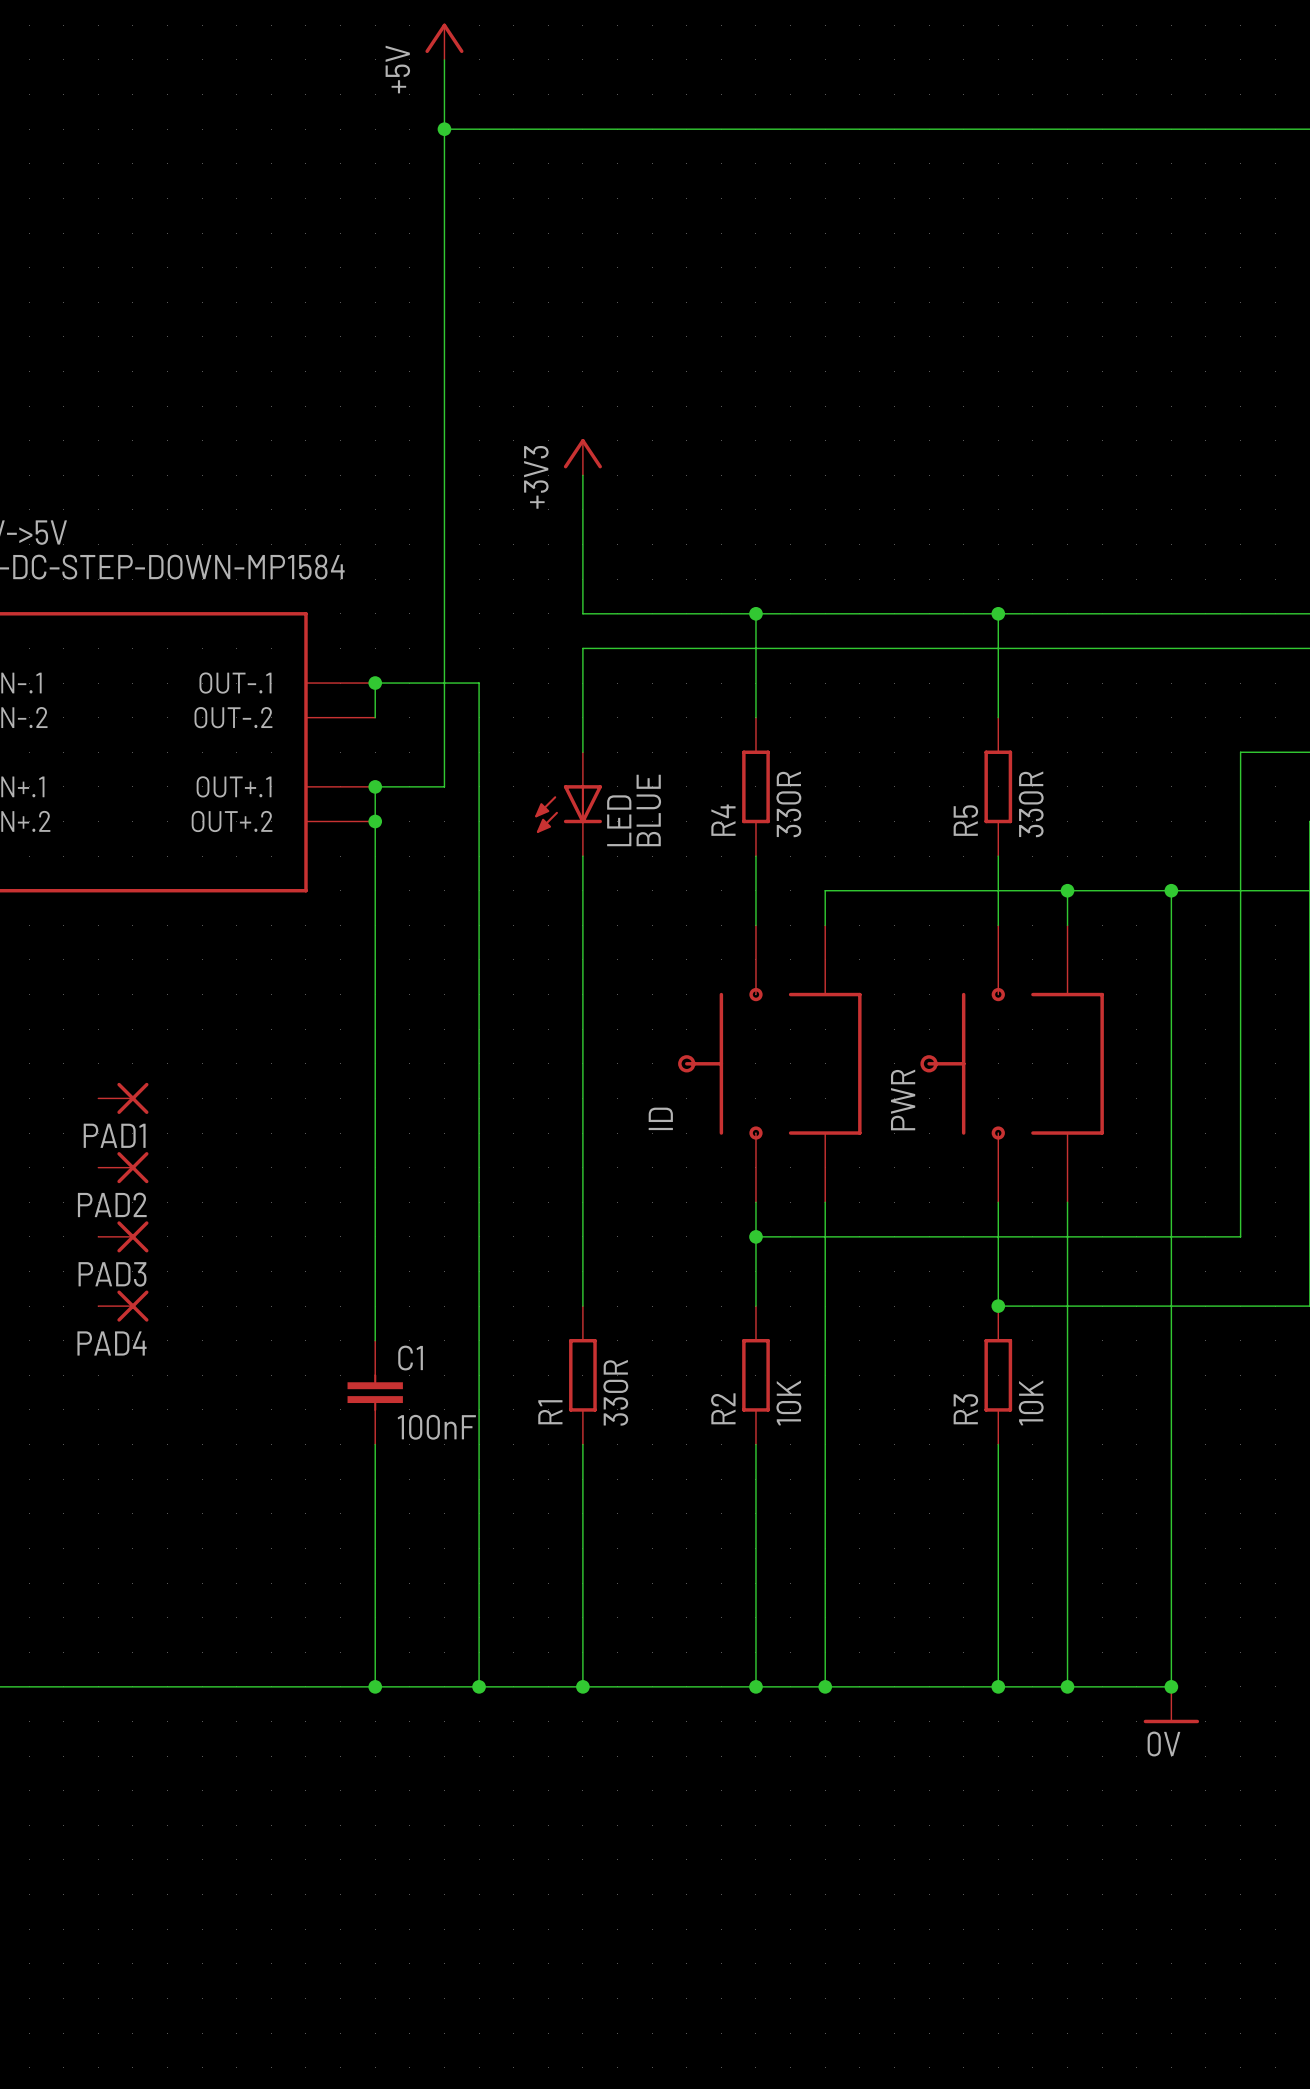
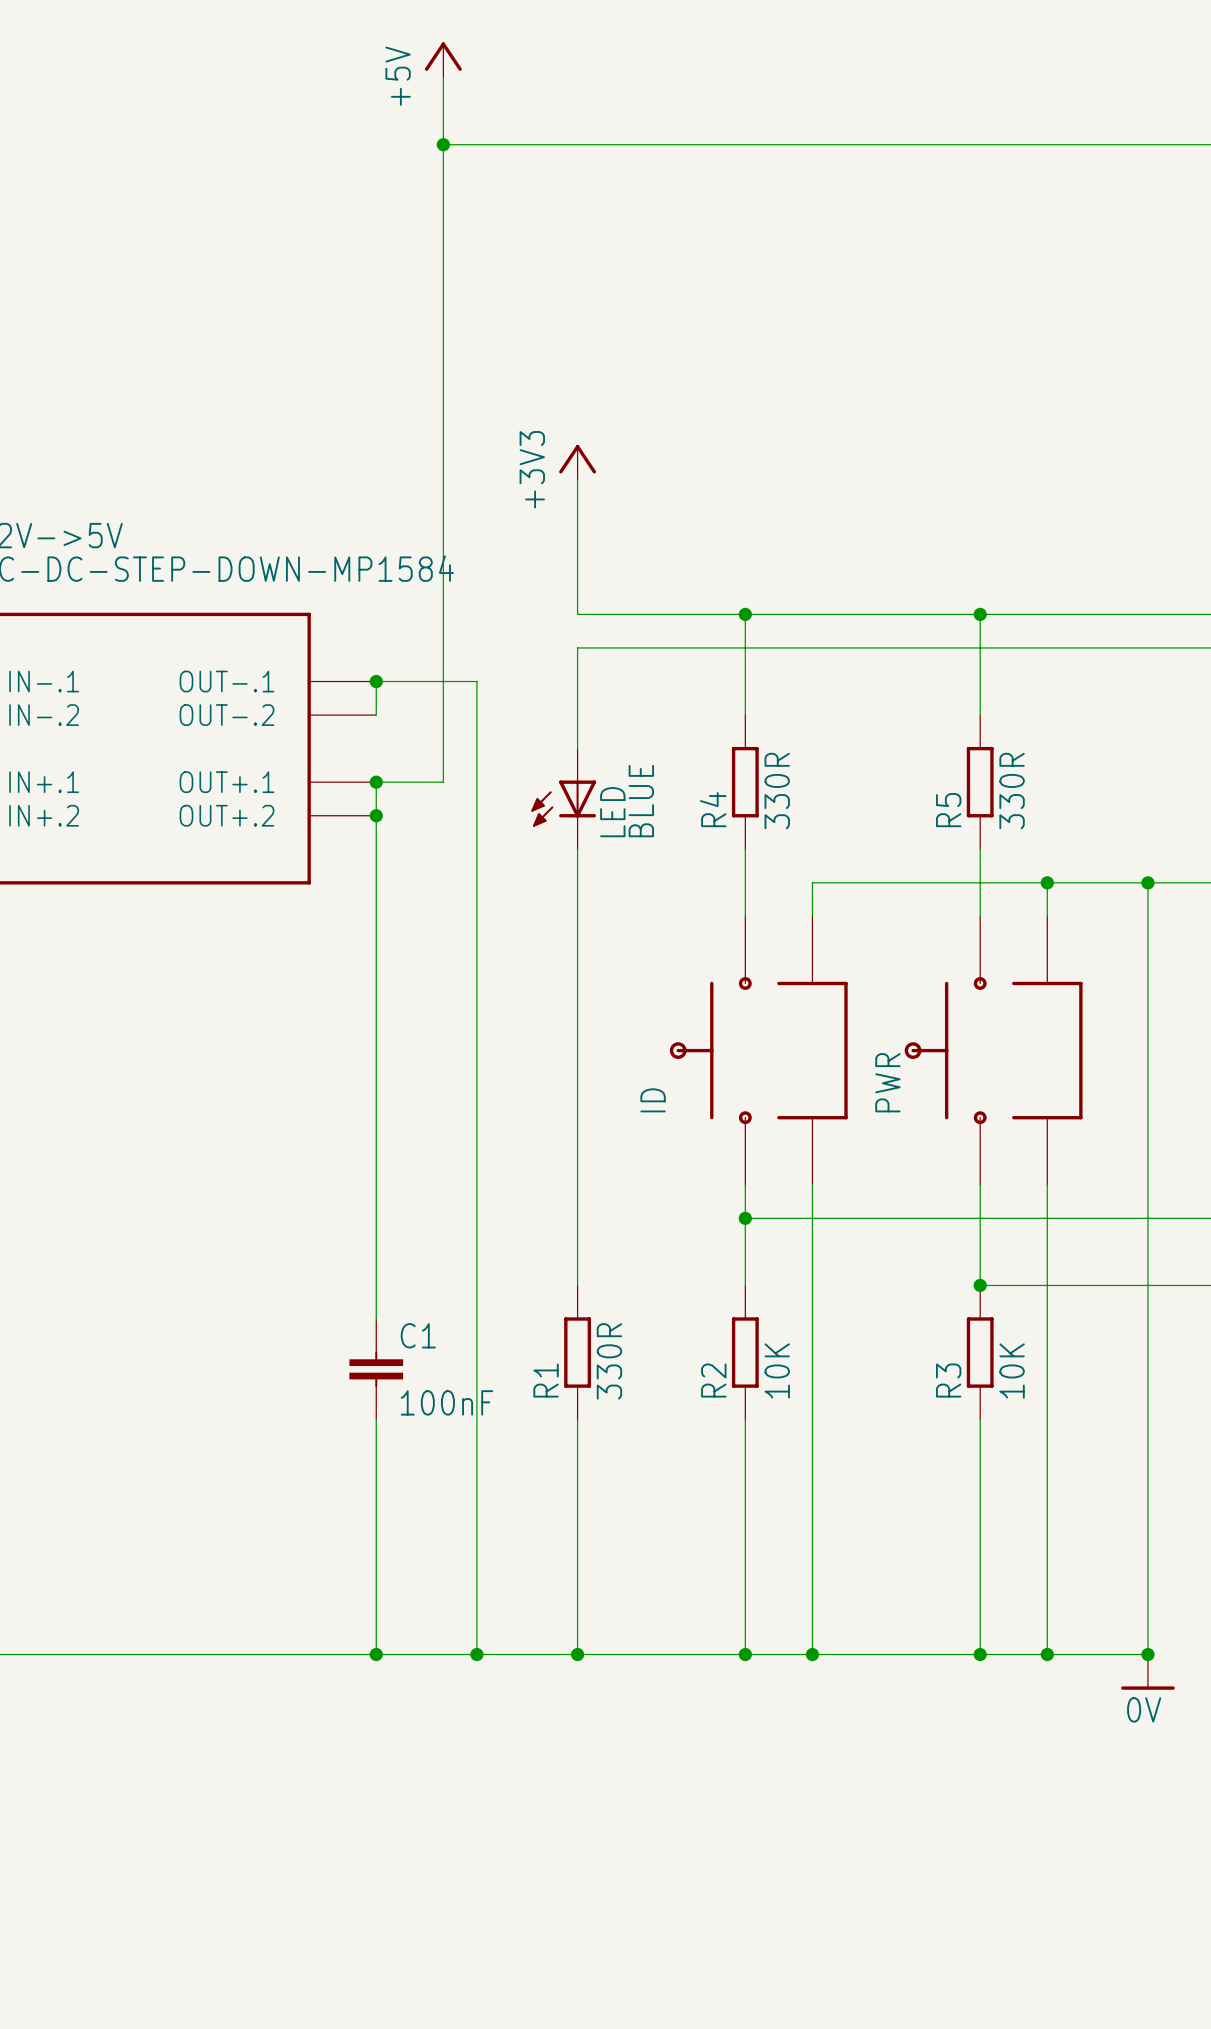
PAD1: (123, 1098) -> none
PAD2: (123, 1167) -> none
PAD3: (123, 1236) -> none
PAD4: (123, 1306) -> none

